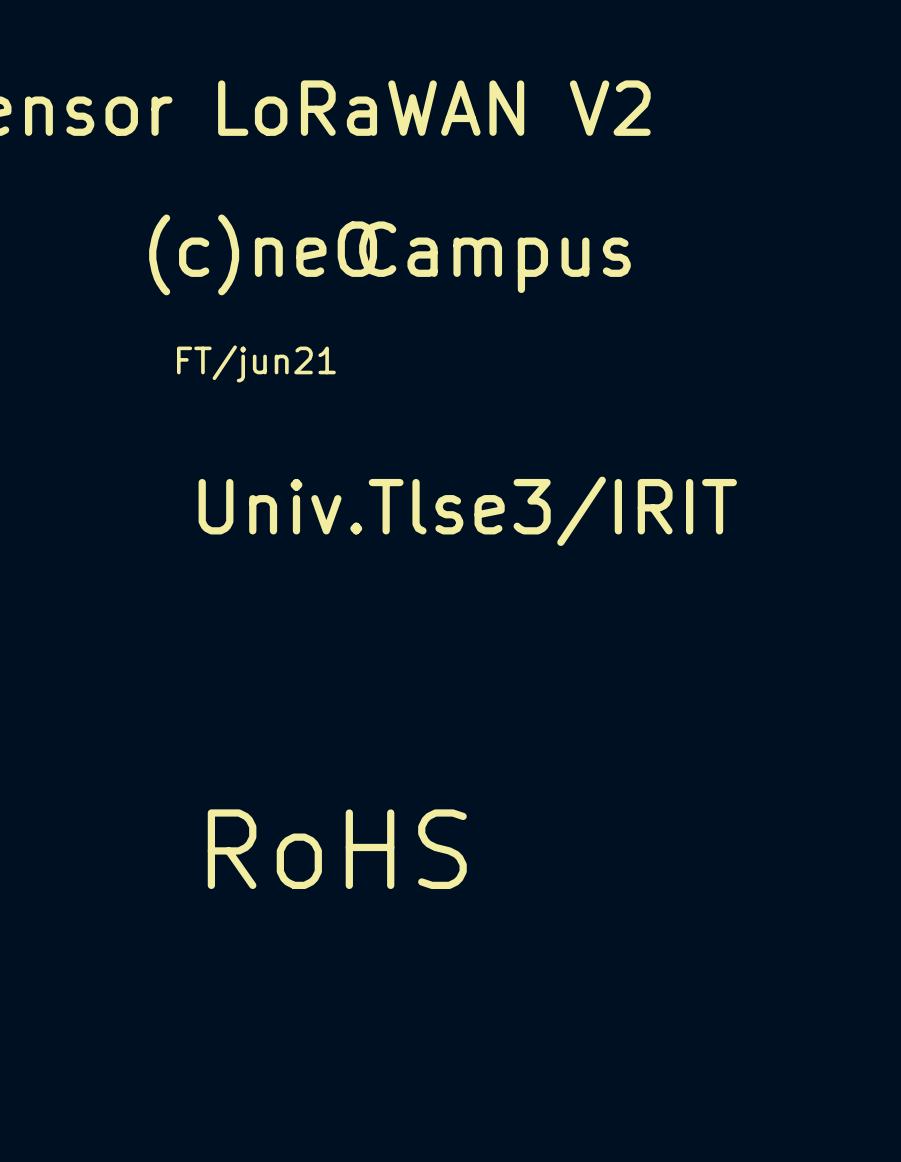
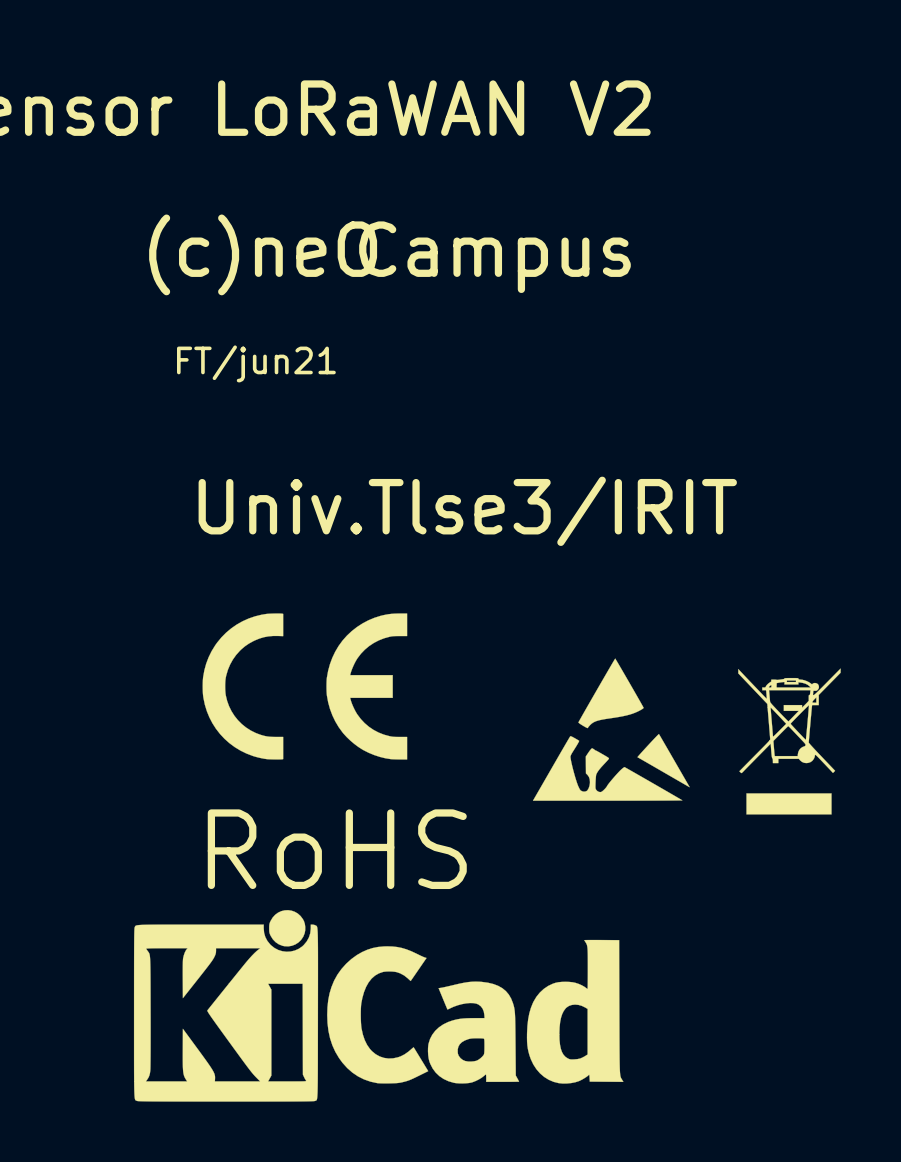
drawing: none -> [202, 613, 408, 760]
drawing: none -> [532, 658, 690, 801]
drawing: none -> [738, 668, 841, 815]
drawing: none -> [133, 910, 624, 1102]

